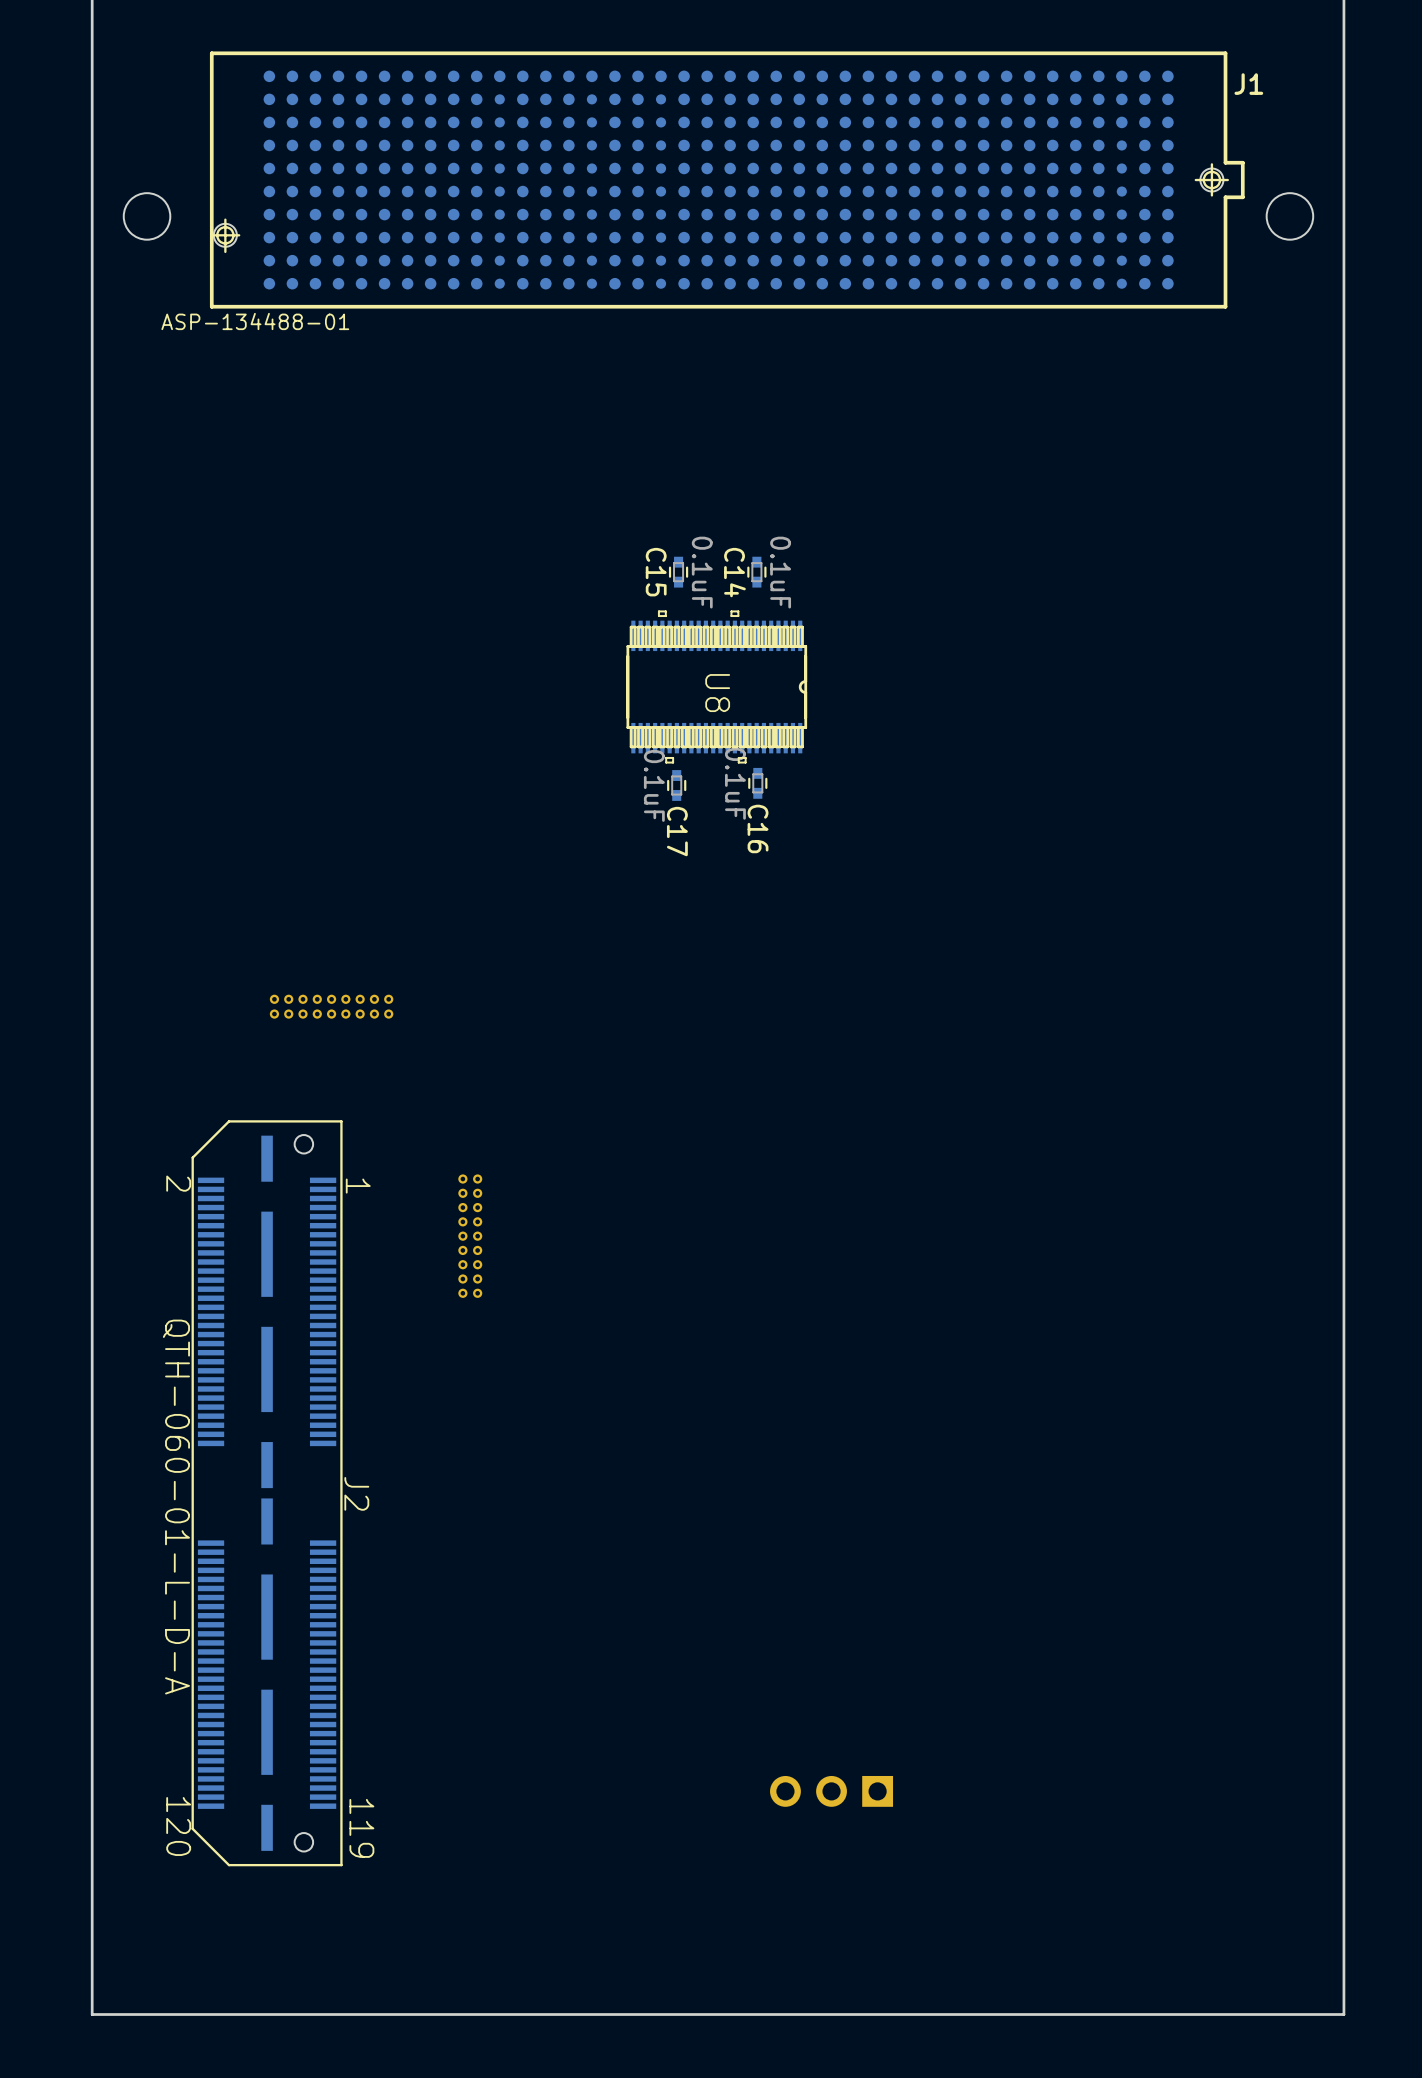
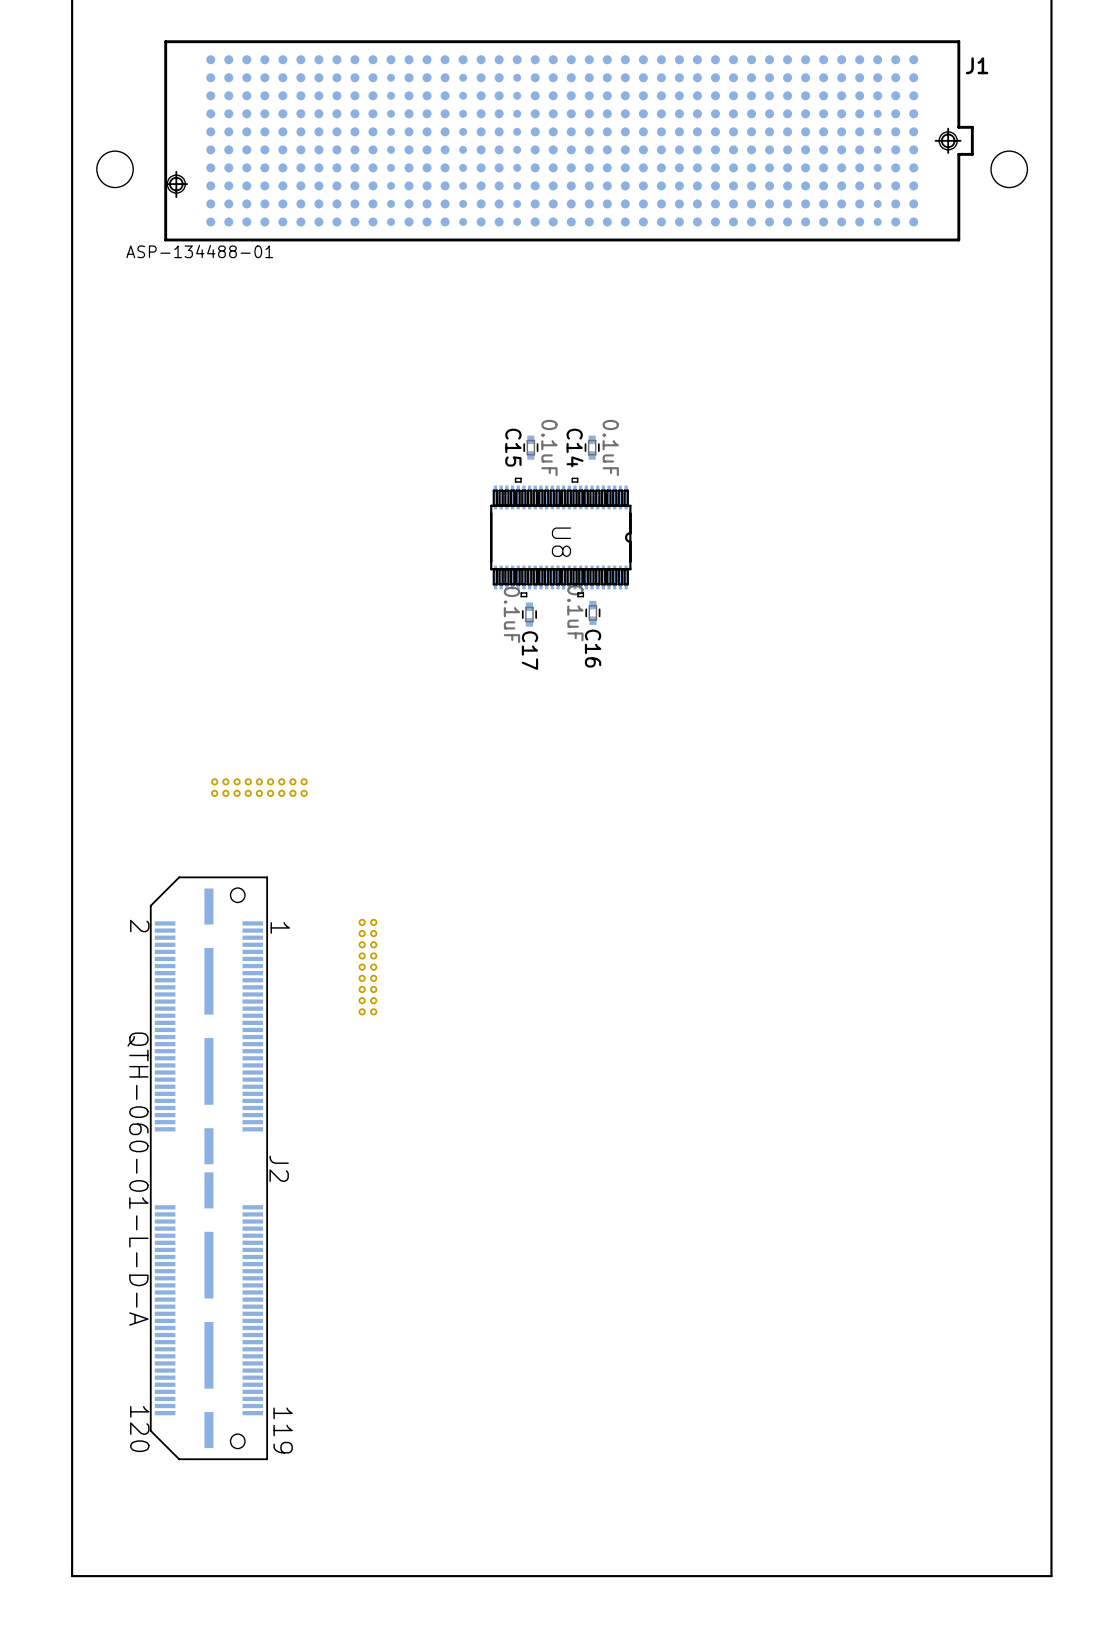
part: (831, 1791) -> none

